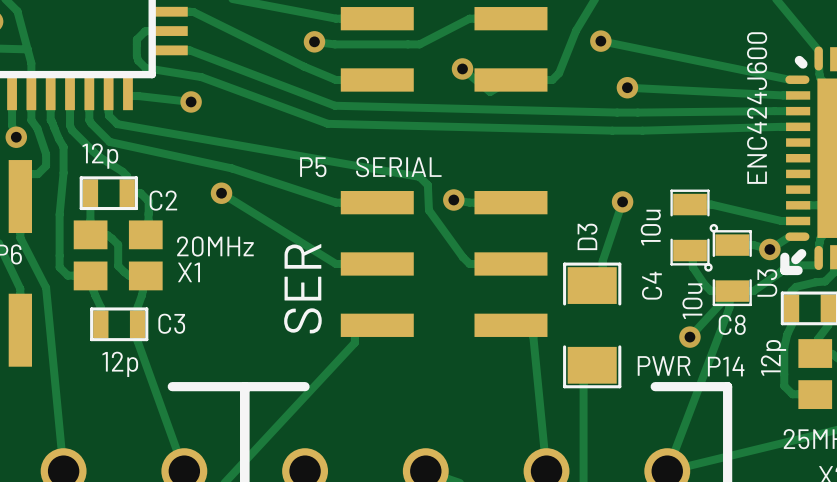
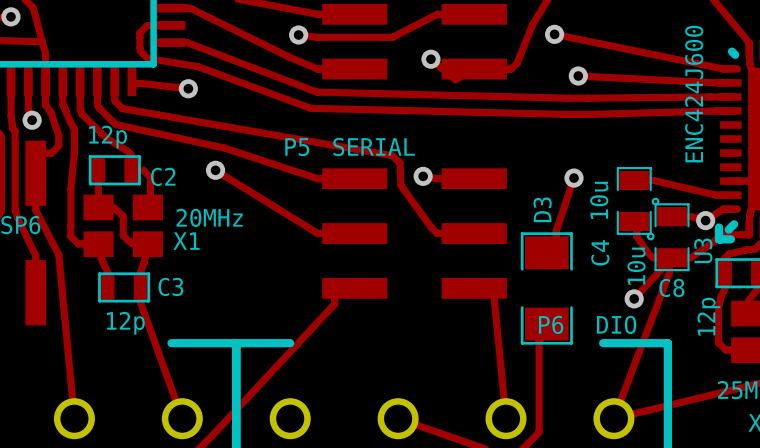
text: SER (302, 288) -> none
P14 value: PWR (664, 365) -> DIO (616, 324)
P14 name: P14 (726, 366) -> P6 (551, 324)

